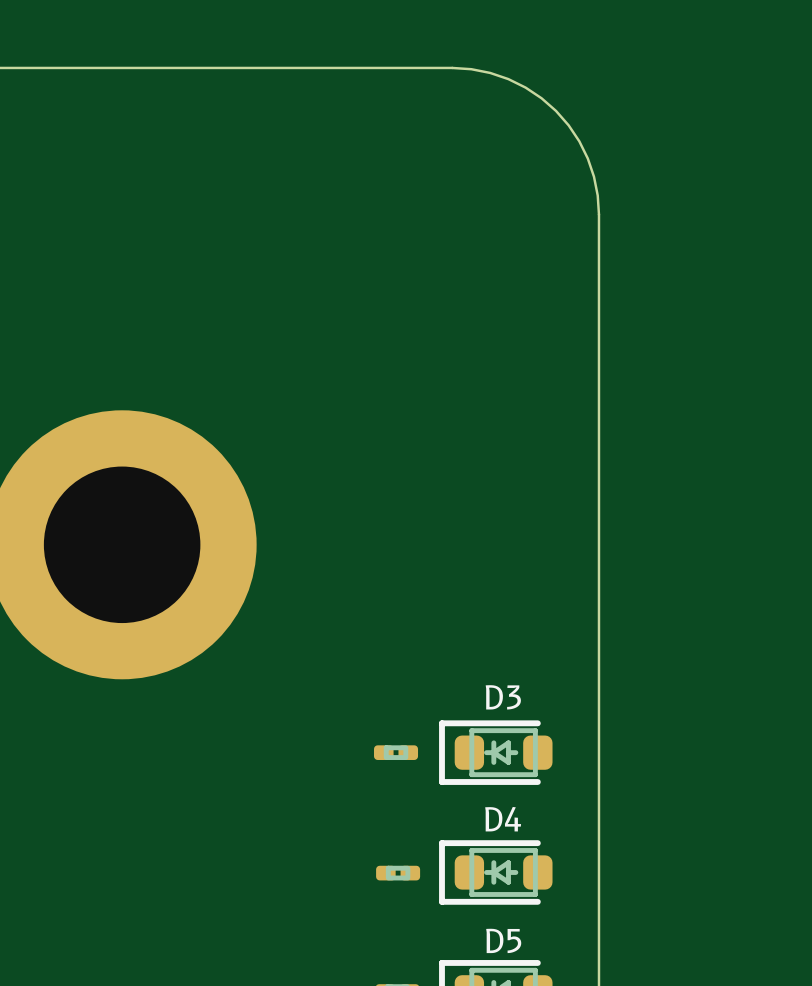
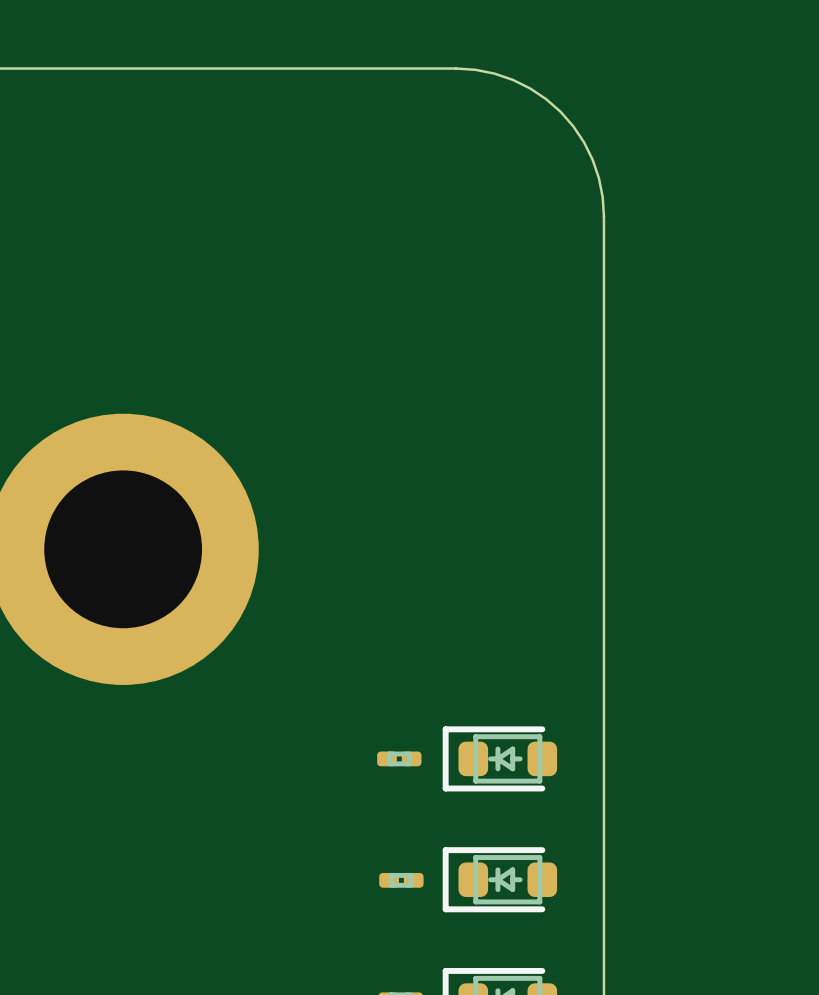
D3 name: D3 (503, 697) -> none
D4 name: D4 (503, 819) -> none
D5 name: D5 (503, 940) -> none

